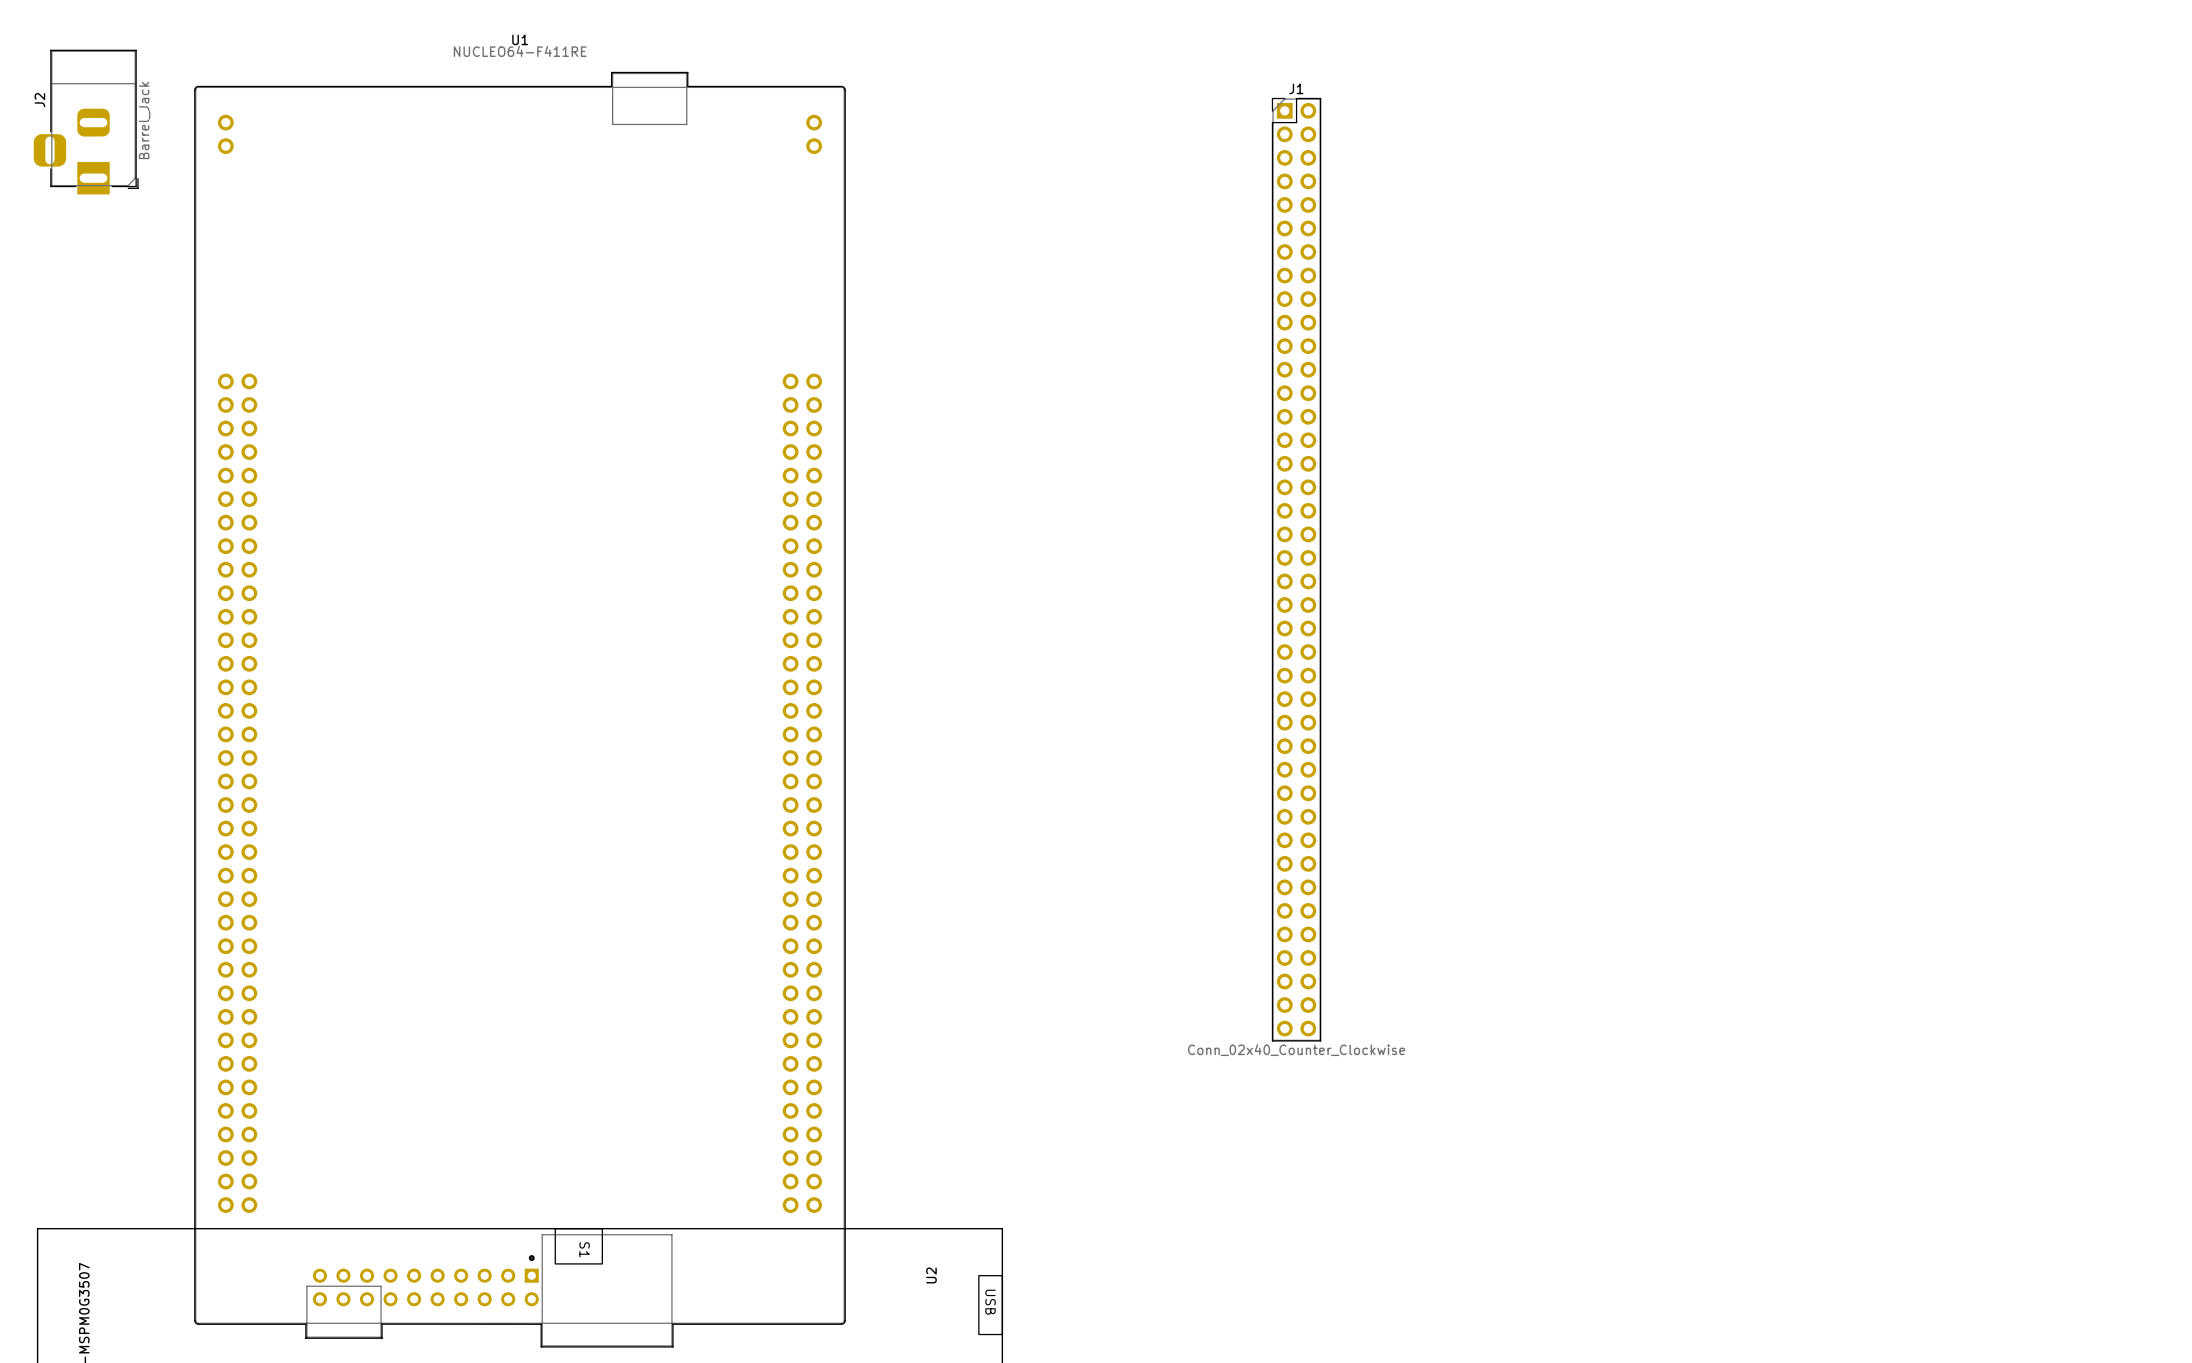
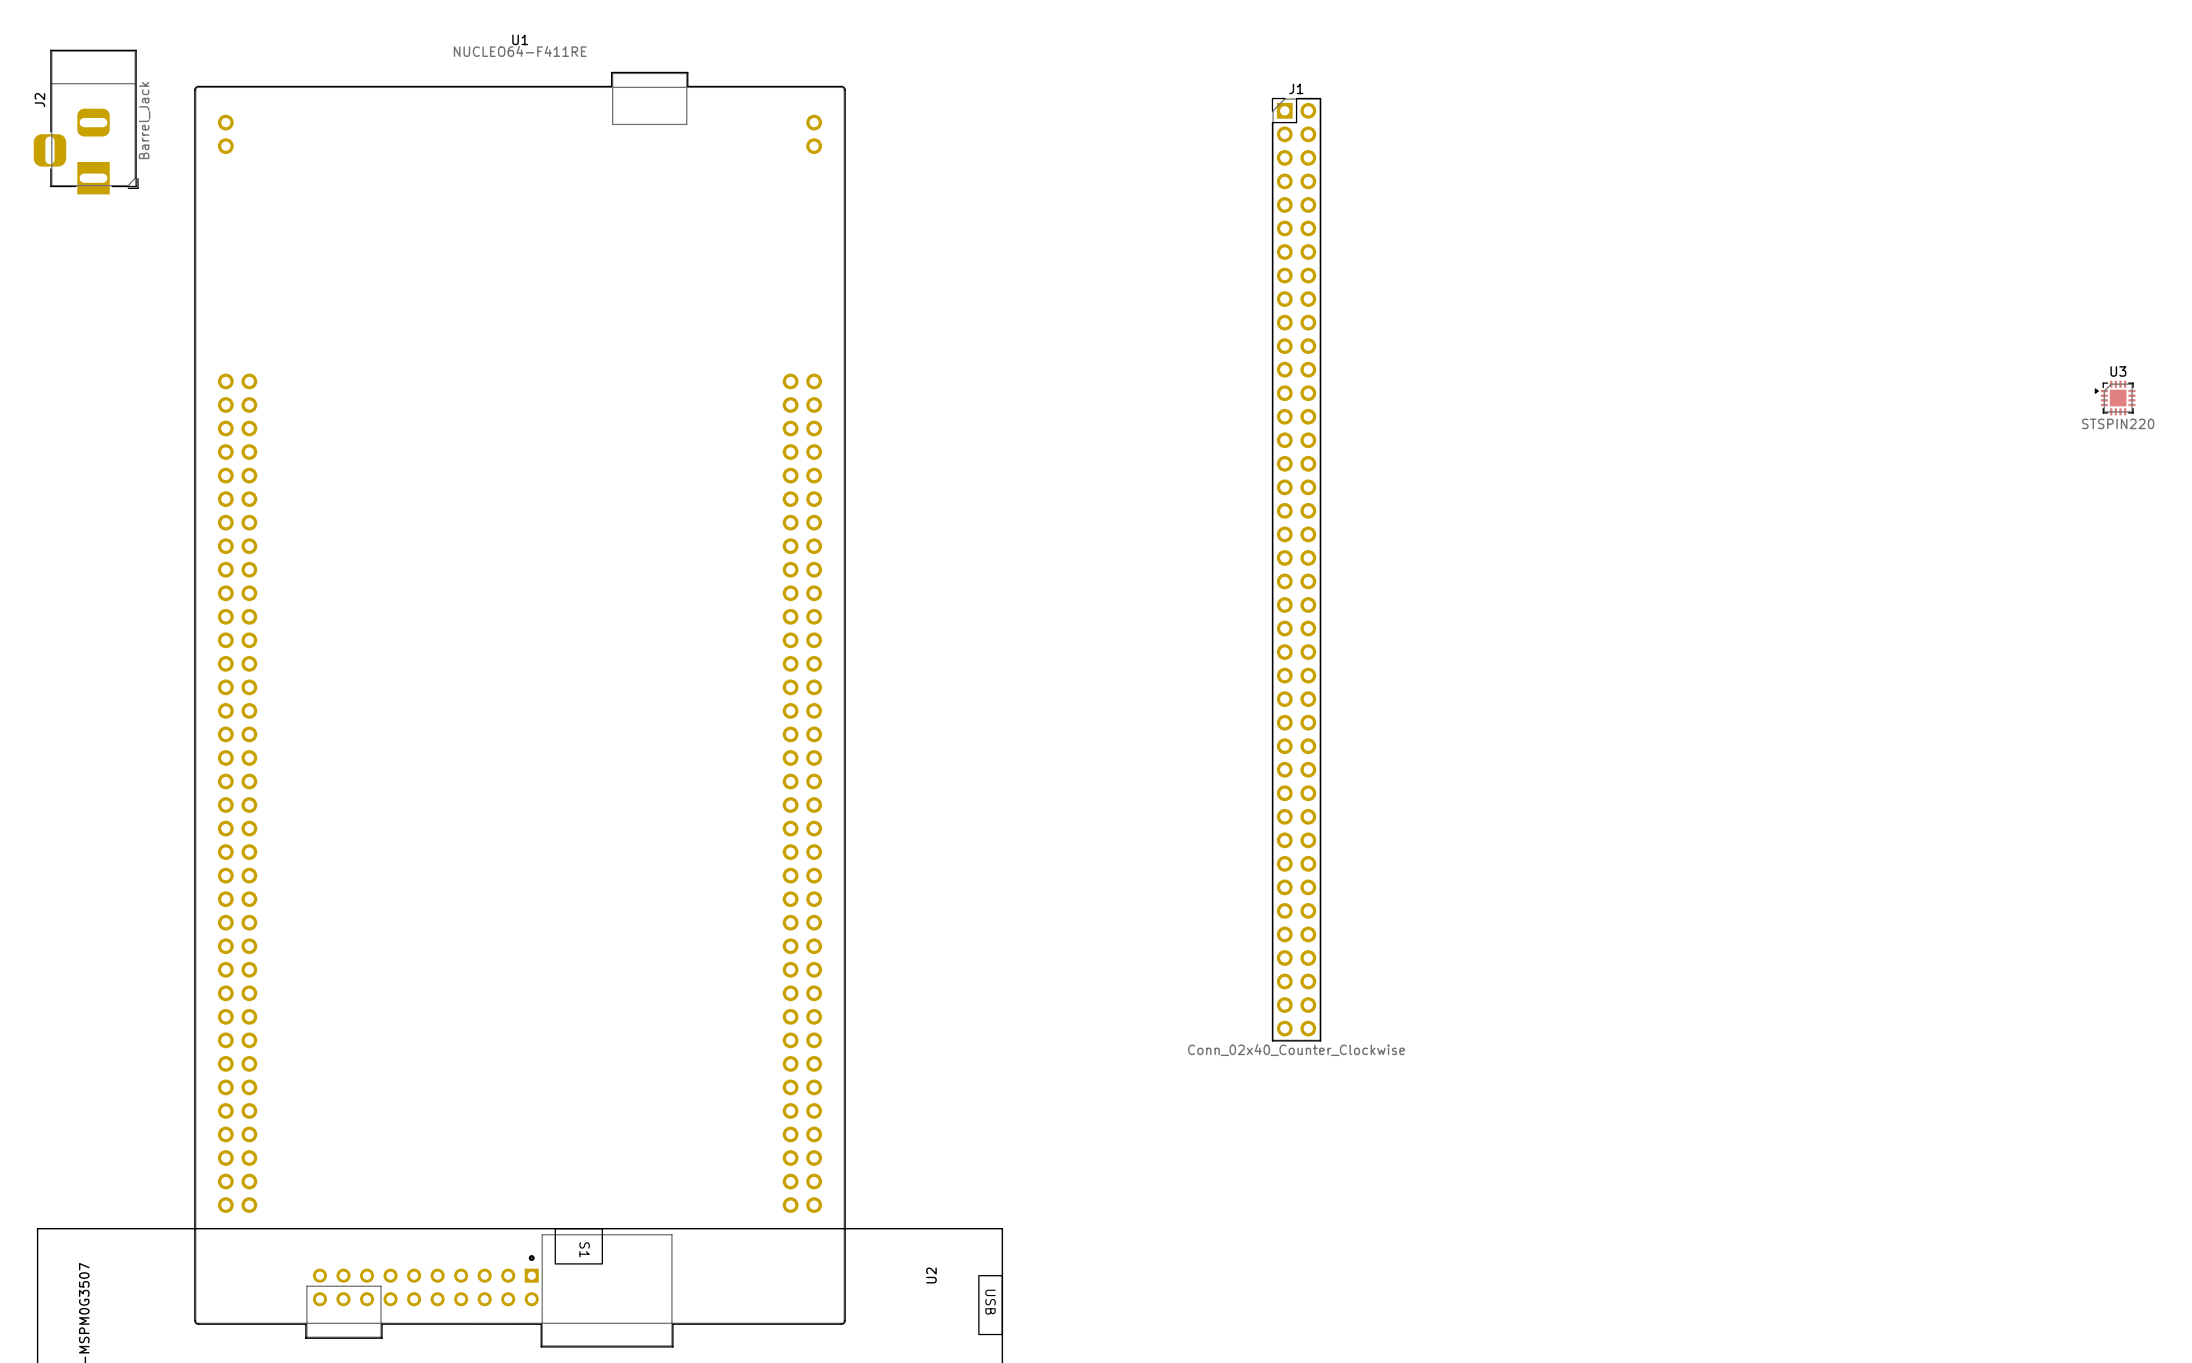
U3: none -> STSPIN220 (2115, 398)

